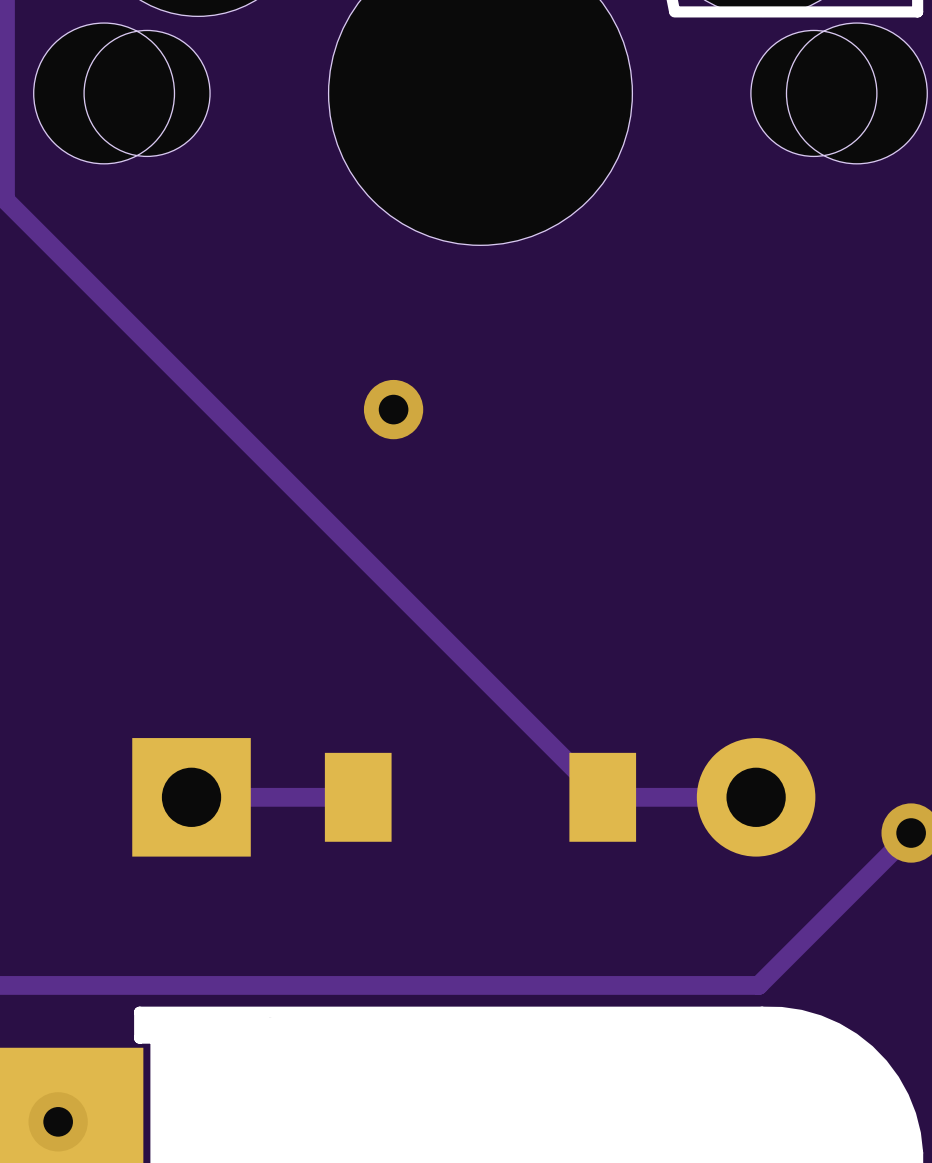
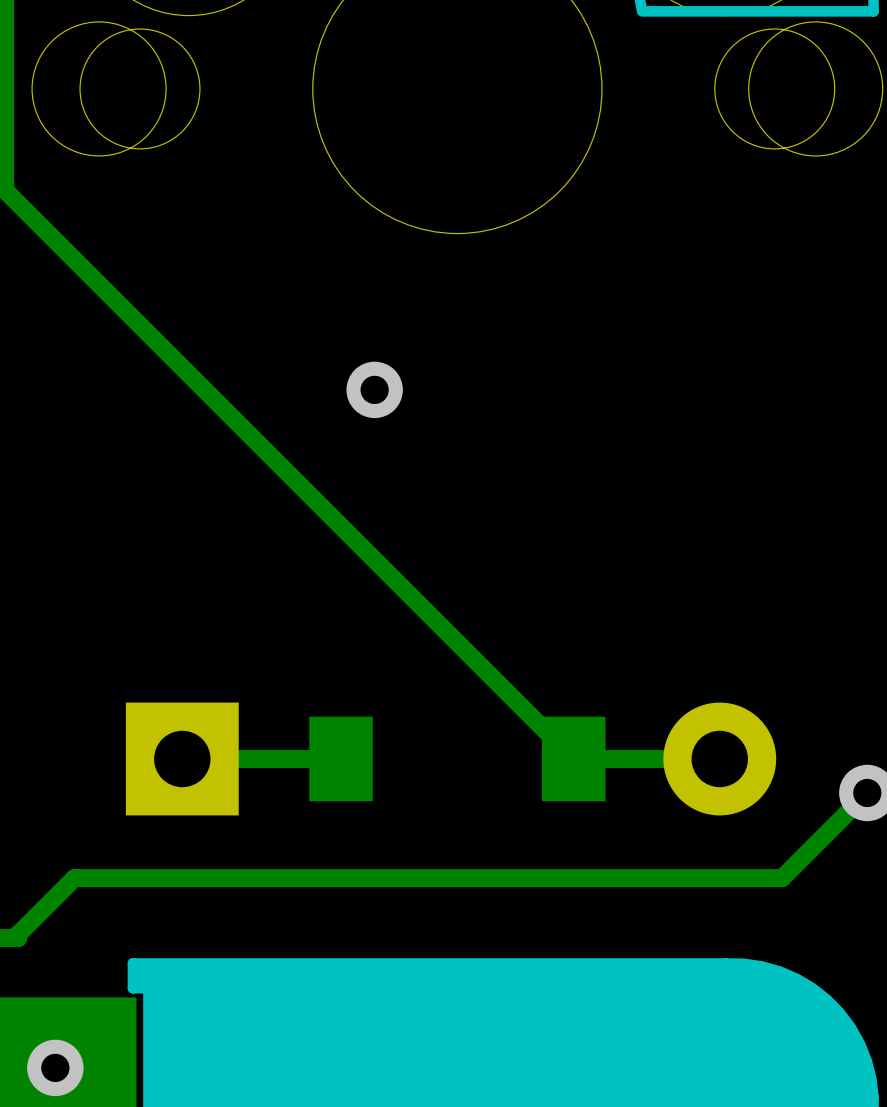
track: (821, 922) (758, 985) (19, 985) -> (782, 878) (74, 878) (18, 934) (18, 938)

